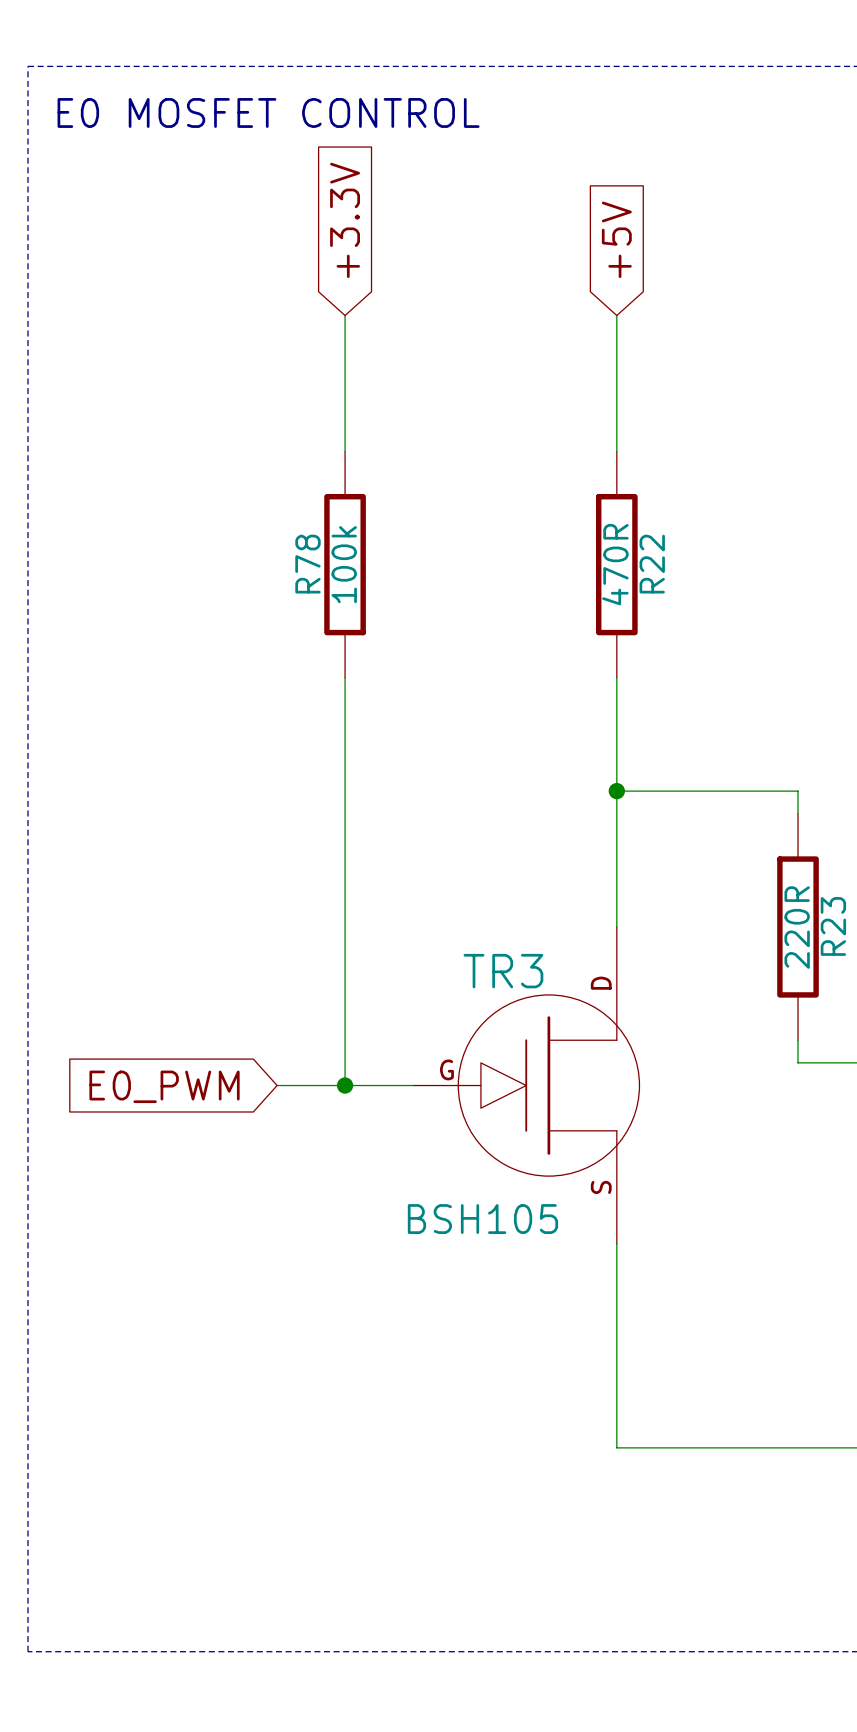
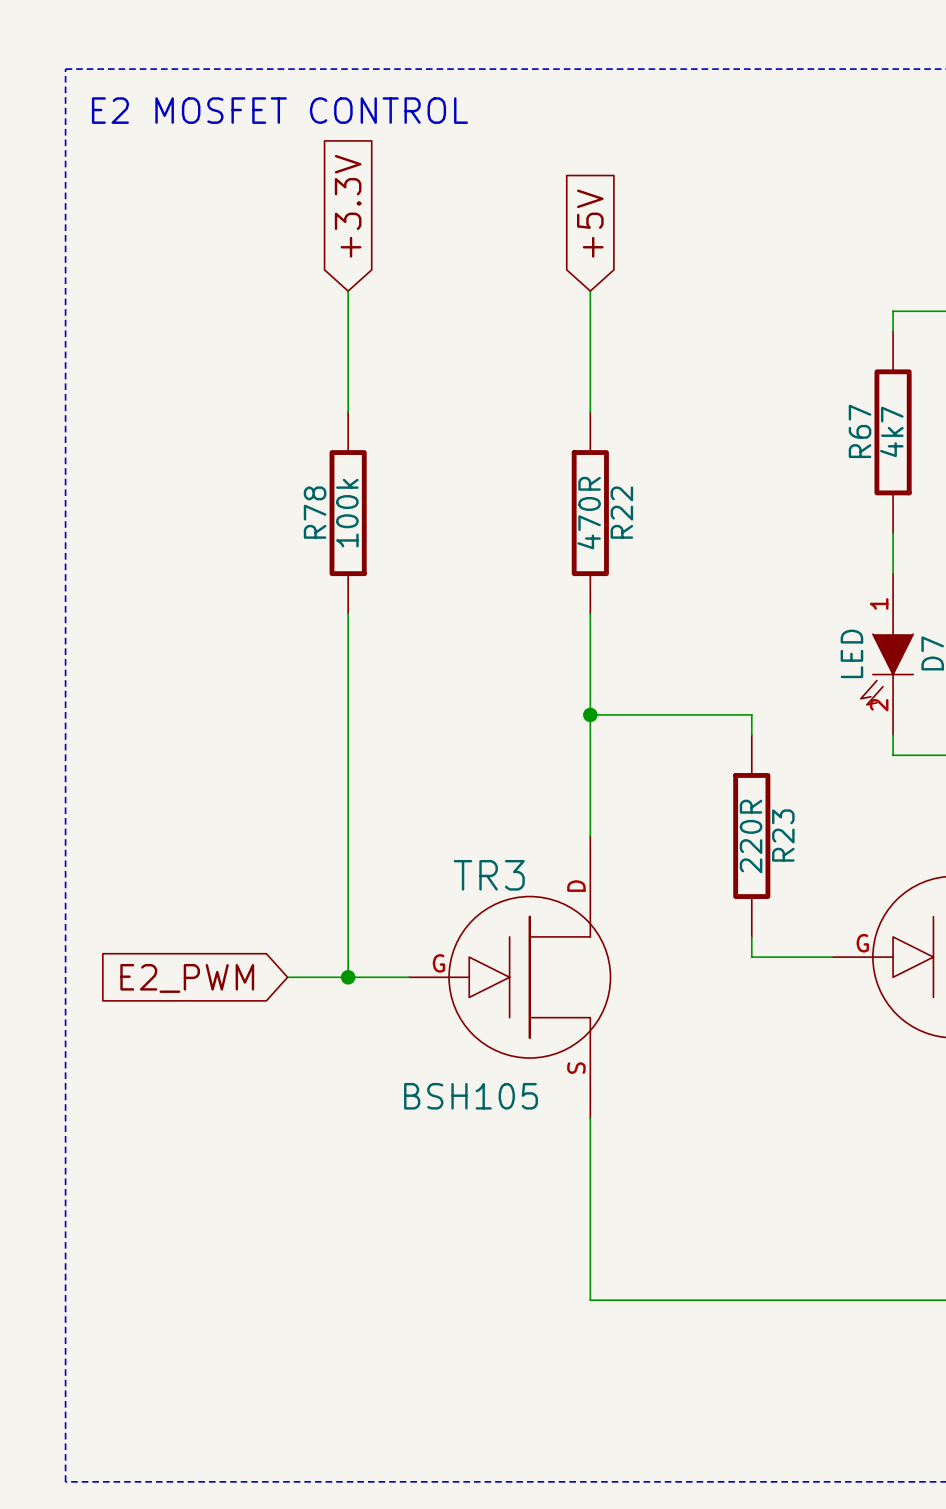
text: E0 MOSFET CONTROL (268, 112) -> E2 MOSFET CONTROL (279, 110)
global label: E0_PWM (164, 1086) -> E2_PWM (187, 978)

